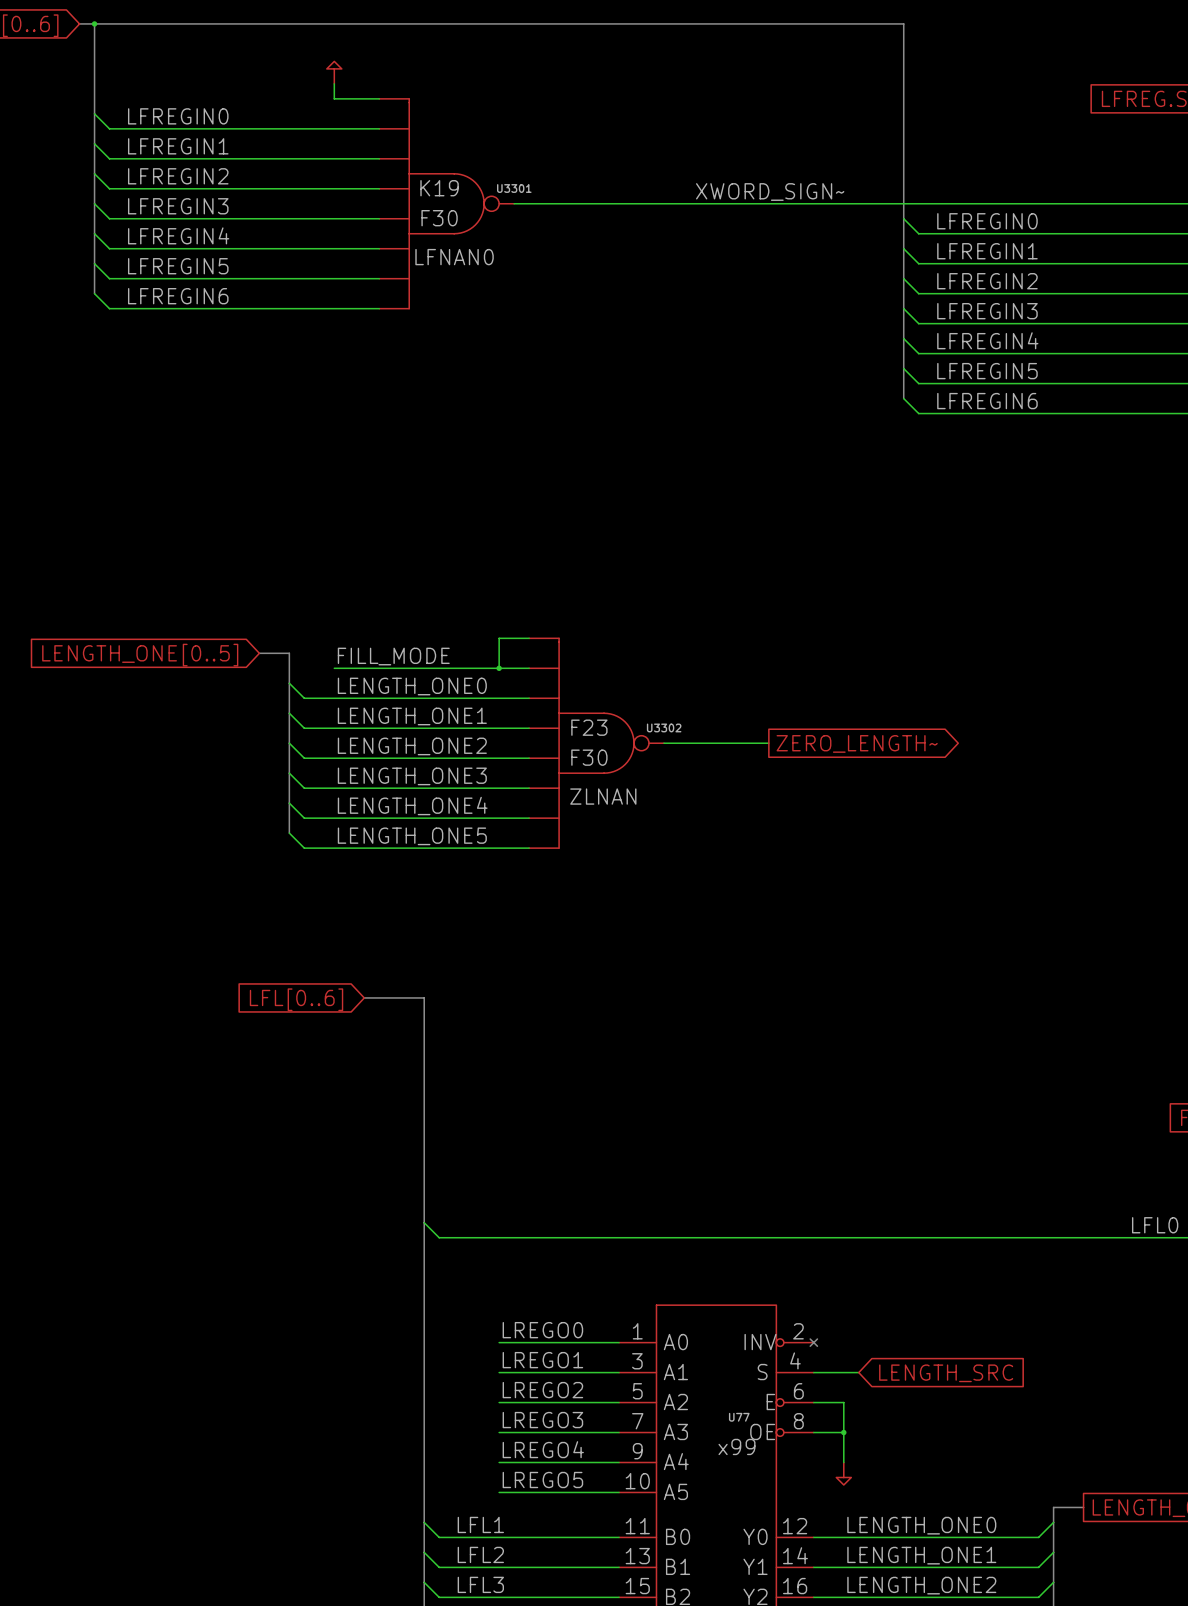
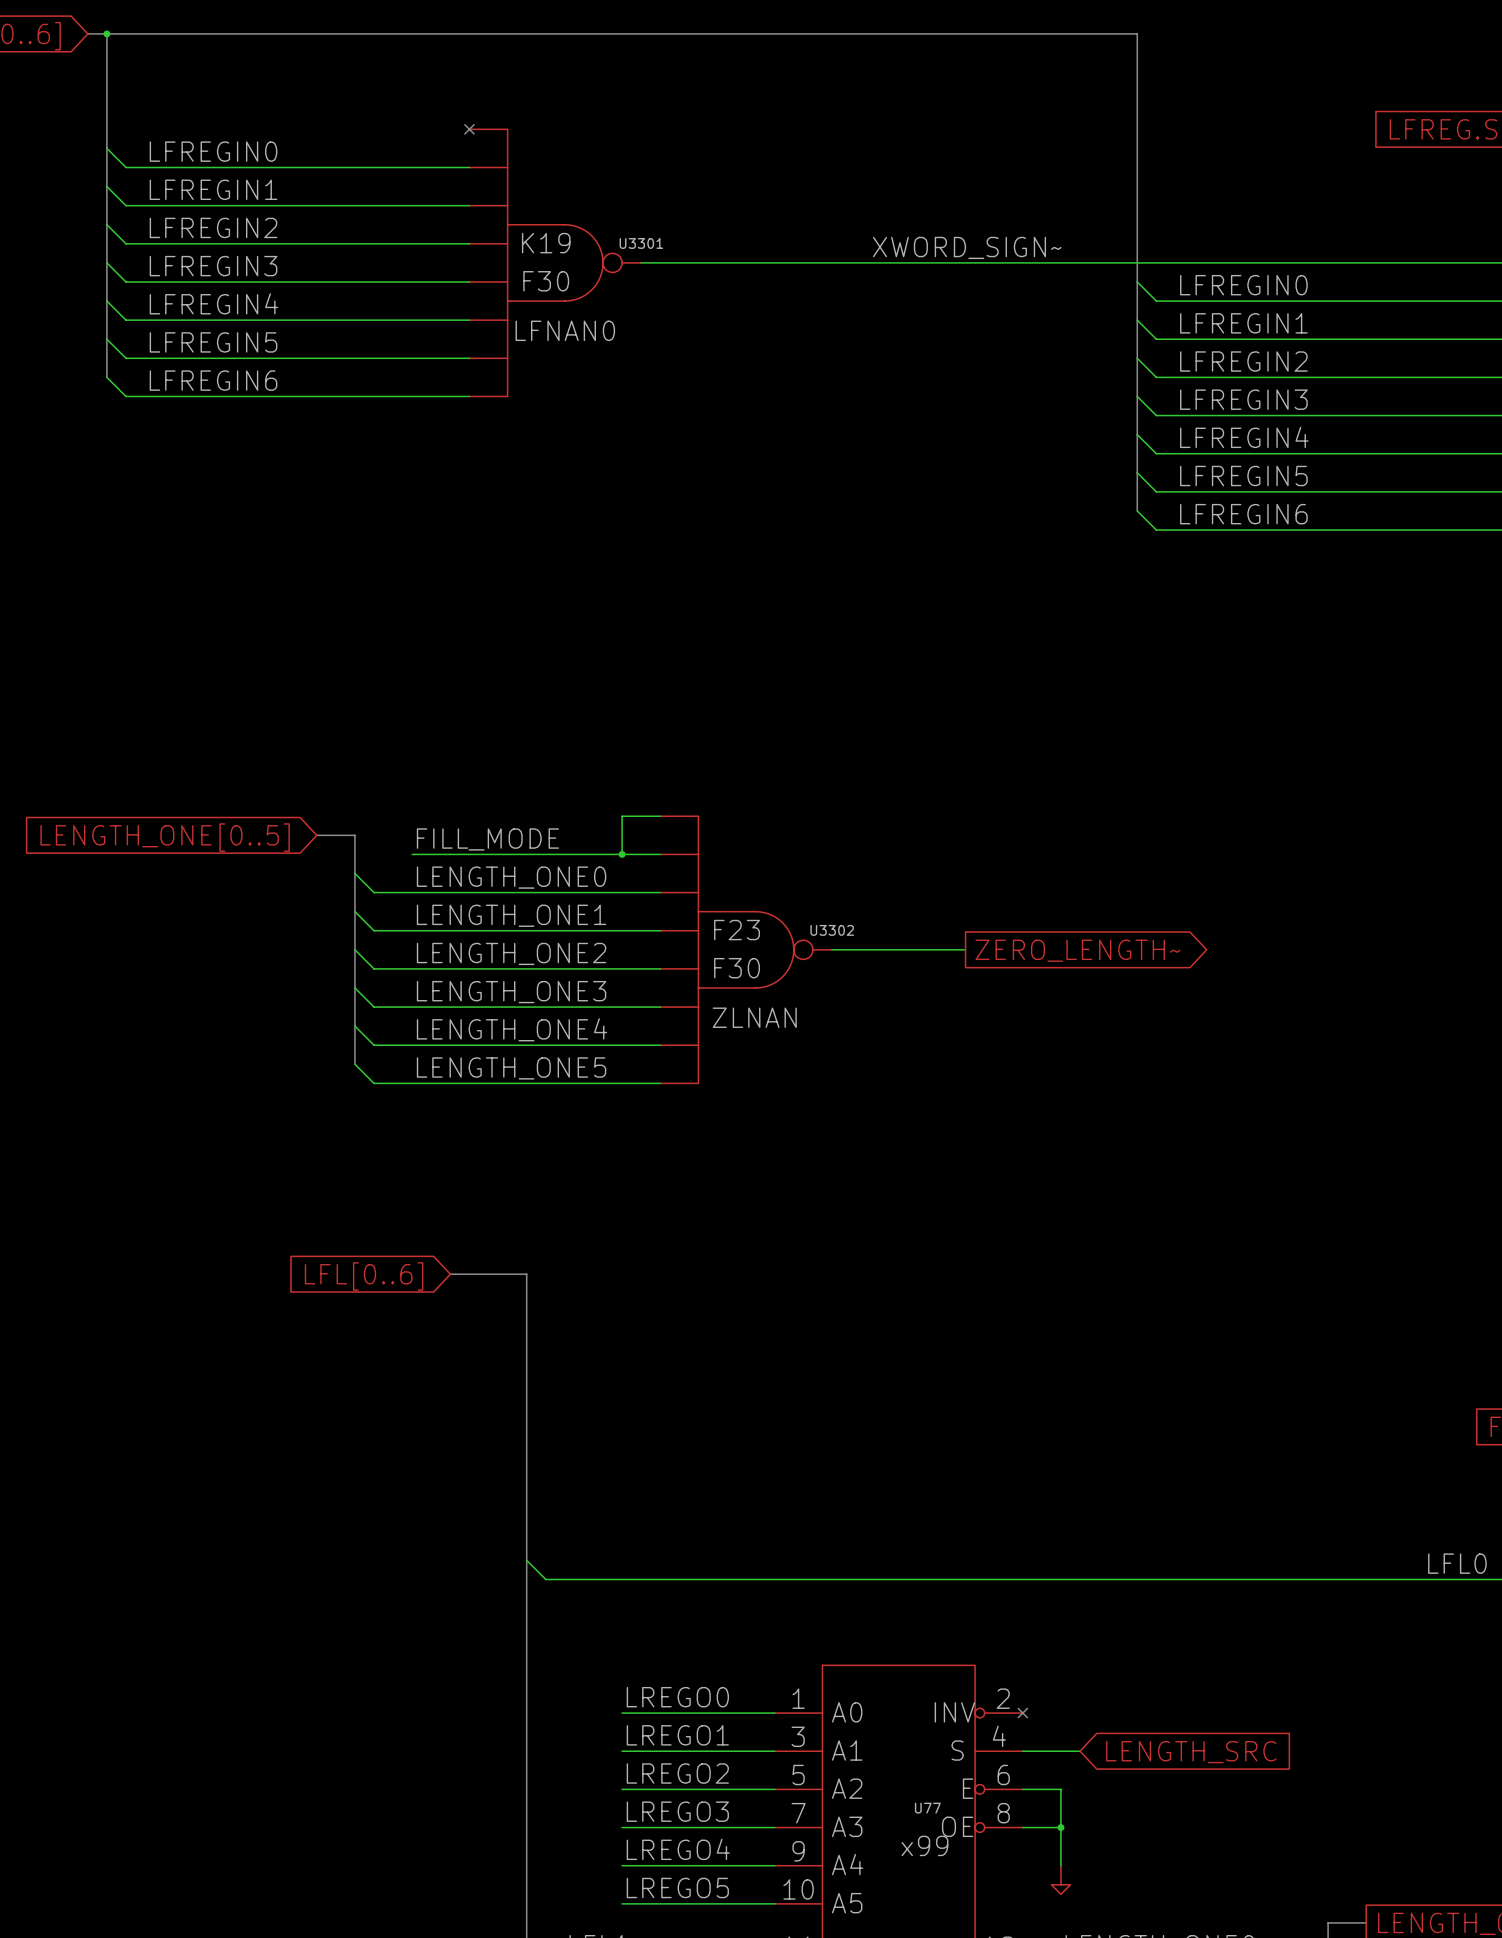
power symbol: (334, 72) -> none
wire: (334, 83) (334, 98) (379, 98) -> none
no-connect mark: none -> (469, 129)

